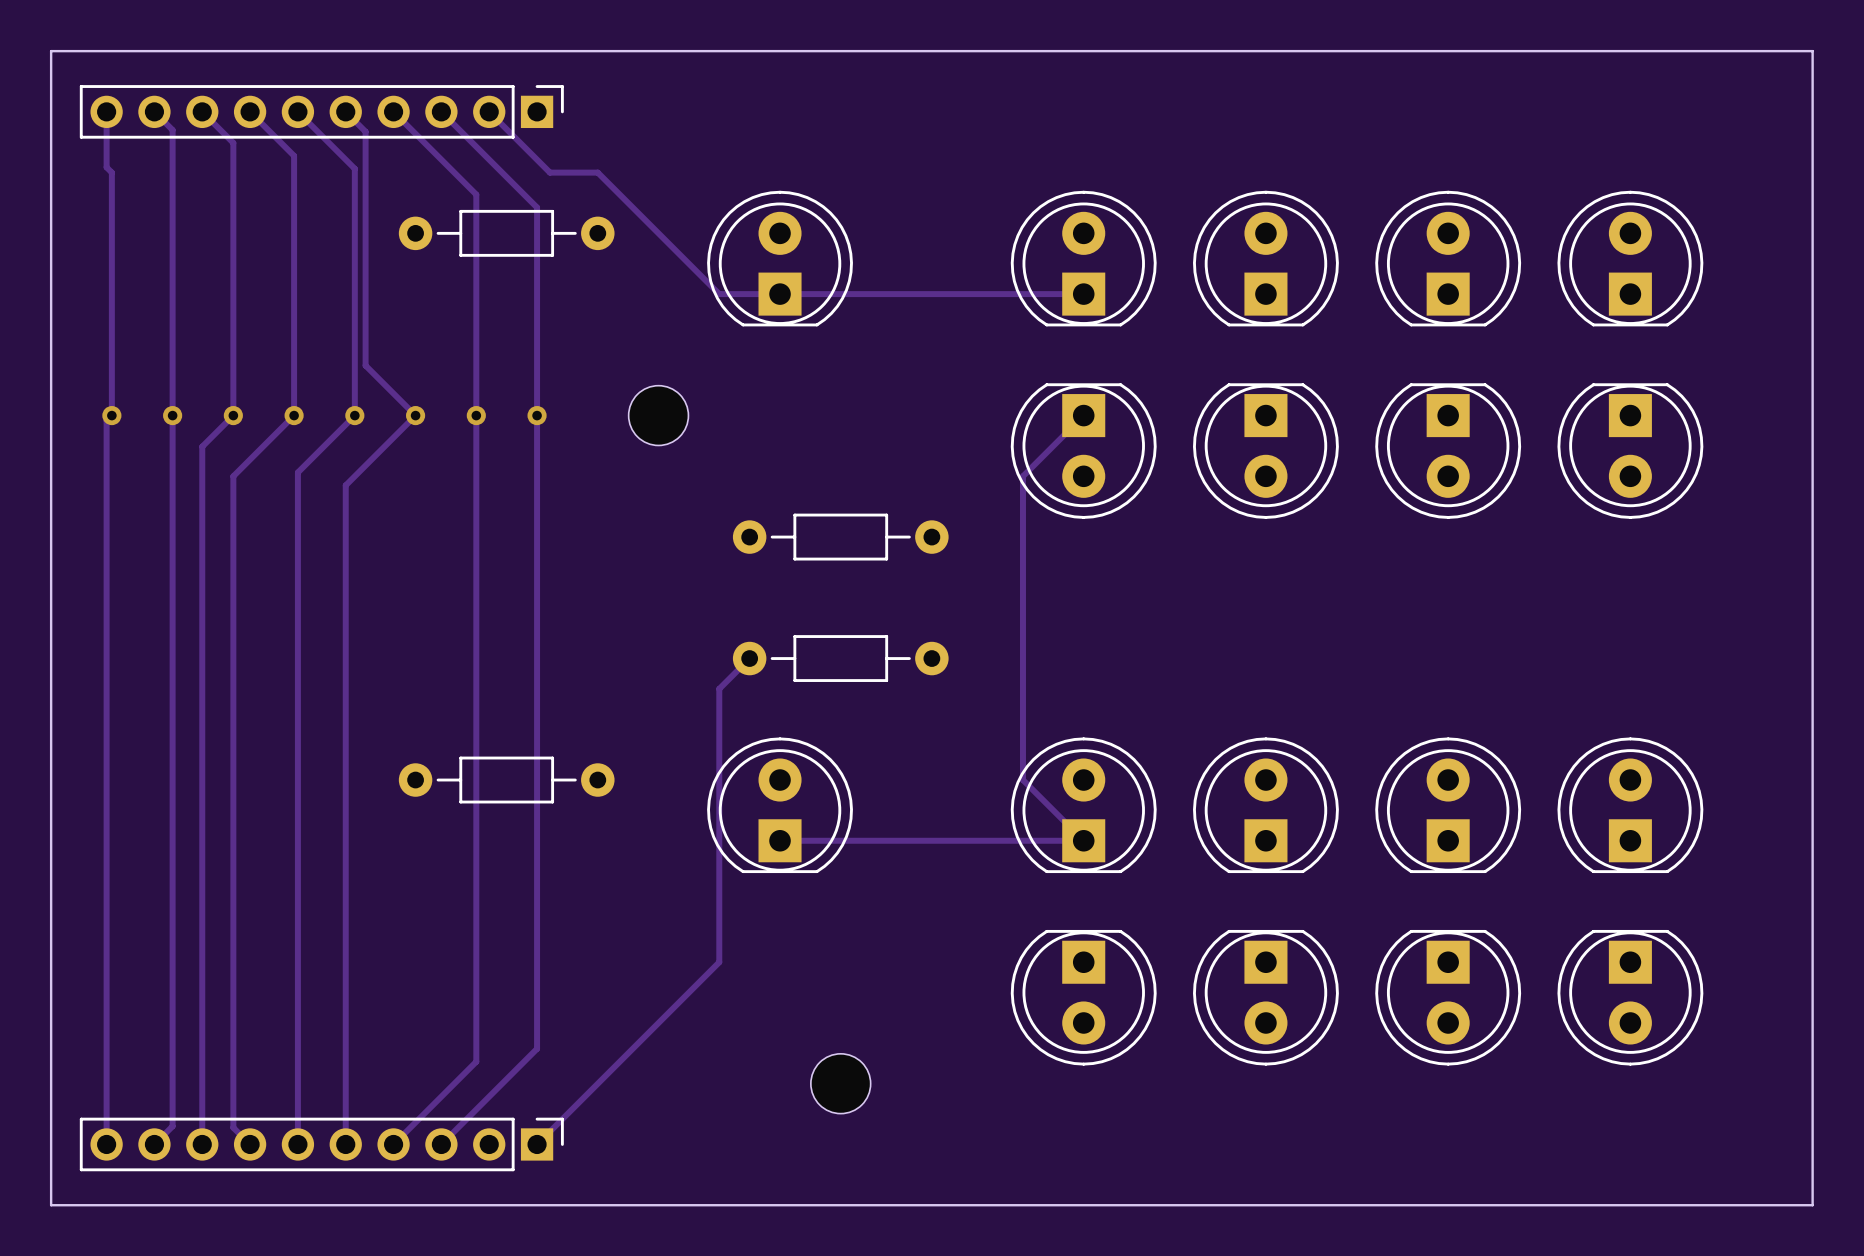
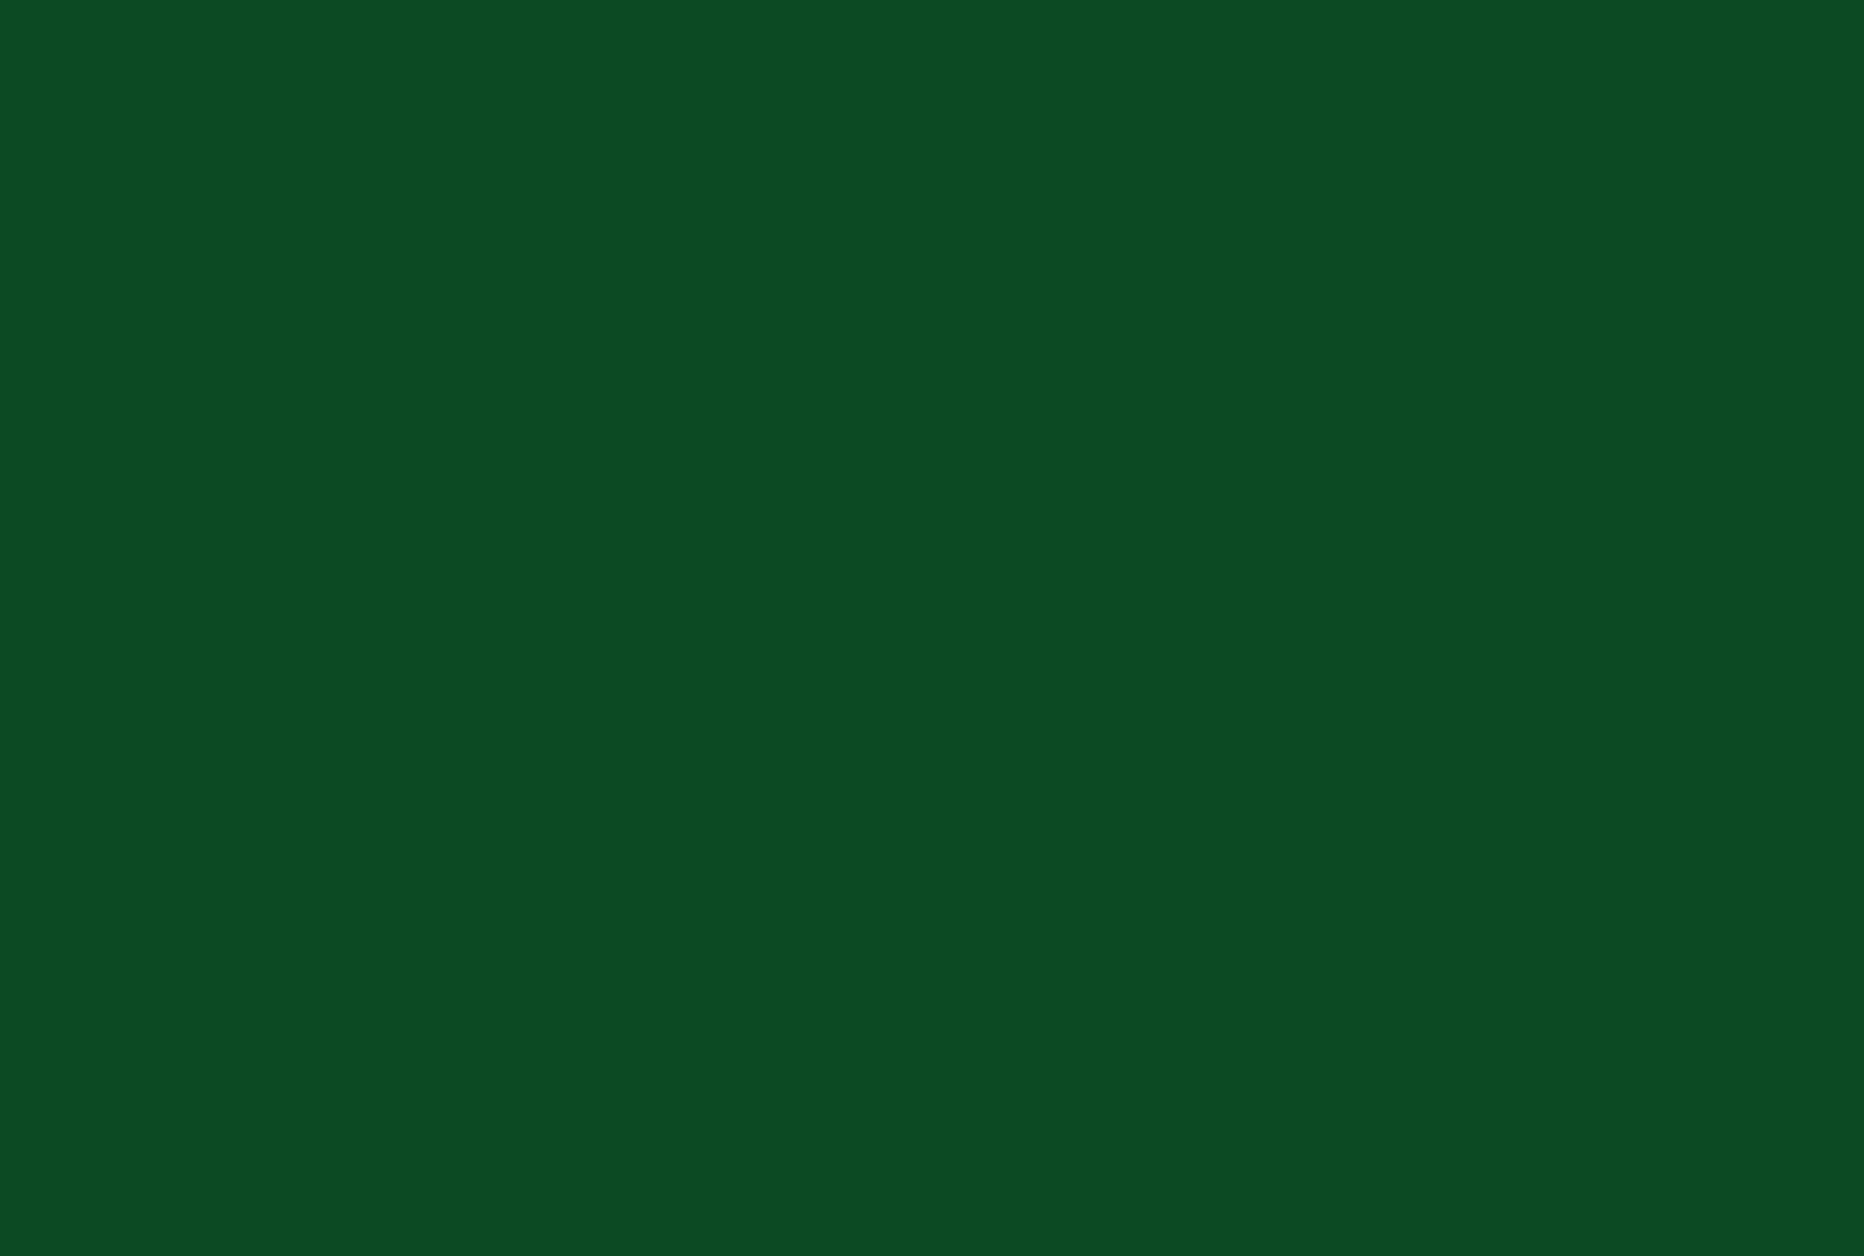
board edge: (51, 51) (1812, 51) (1812, 1205) (51, 1205) (51, 51) -> none
track: (106, 111) (106, 167) (111, 172) (111, 415) (106, 420) (106, 1144) -> none
track: (154, 111) (172, 130) (172, 1126) (154, 1144) -> none
track: (202, 111) (233, 142) (233, 415) (202, 446) (202, 1144) -> none
track: (250, 111) (294, 155) (294, 415) (233, 476) (233, 1127) (250, 1144) -> none
track: (297, 111) (354, 168) (354, 415) (297, 472) (297, 1144) -> none
part: (321, 111) -> none
track: (345, 111) (365, 131) (365, 365) (415, 415) (345, 485) (345, 1144) -> none
track: (393, 111) (476, 194) (476, 1061) (393, 1144) -> none
track: (441, 111) (537, 207) (537, 1048) (441, 1144) -> none
track: (489, 111) (549, 172) (597, 172) (719, 294) (1083, 294) -> none
part: (506, 233) -> none
part: (780, 258) -> none
part: (1083, 258) -> none
part: (1265, 258) -> none
part: (1448, 258) -> none
part: (1630, 258) -> none
via: (111, 415) -> none
via: (172, 415) -> none
via: (233, 415) -> none
via: (294, 415) -> none
via: (354, 415) -> none
via: (415, 415) -> none
via: (476, 415) -> none
via: (537, 415) -> none
part: (658, 415) -> none
track: (1083, 415) (1022, 476) (1022, 780) (1083, 840) (780, 840) -> none
part: (1083, 451) -> none
part: (1265, 451) -> none
part: (1448, 451) -> none
part: (1630, 451) -> none
part: (840, 537) -> none
track: (749, 658) (719, 688) (719, 962) (537, 1144) -> none
part: (840, 658) -> none
part: (506, 780) -> none
part: (780, 805) -> none
part: (1083, 805) -> none
part: (1265, 805) -> none
part: (1448, 805) -> none
part: (1630, 805) -> none
part: (1083, 997) -> none
part: (1265, 997) -> none
part: (1448, 997) -> none
part: (1630, 997) -> none
part: (840, 1083) -> none
part: (321, 1144) -> none

